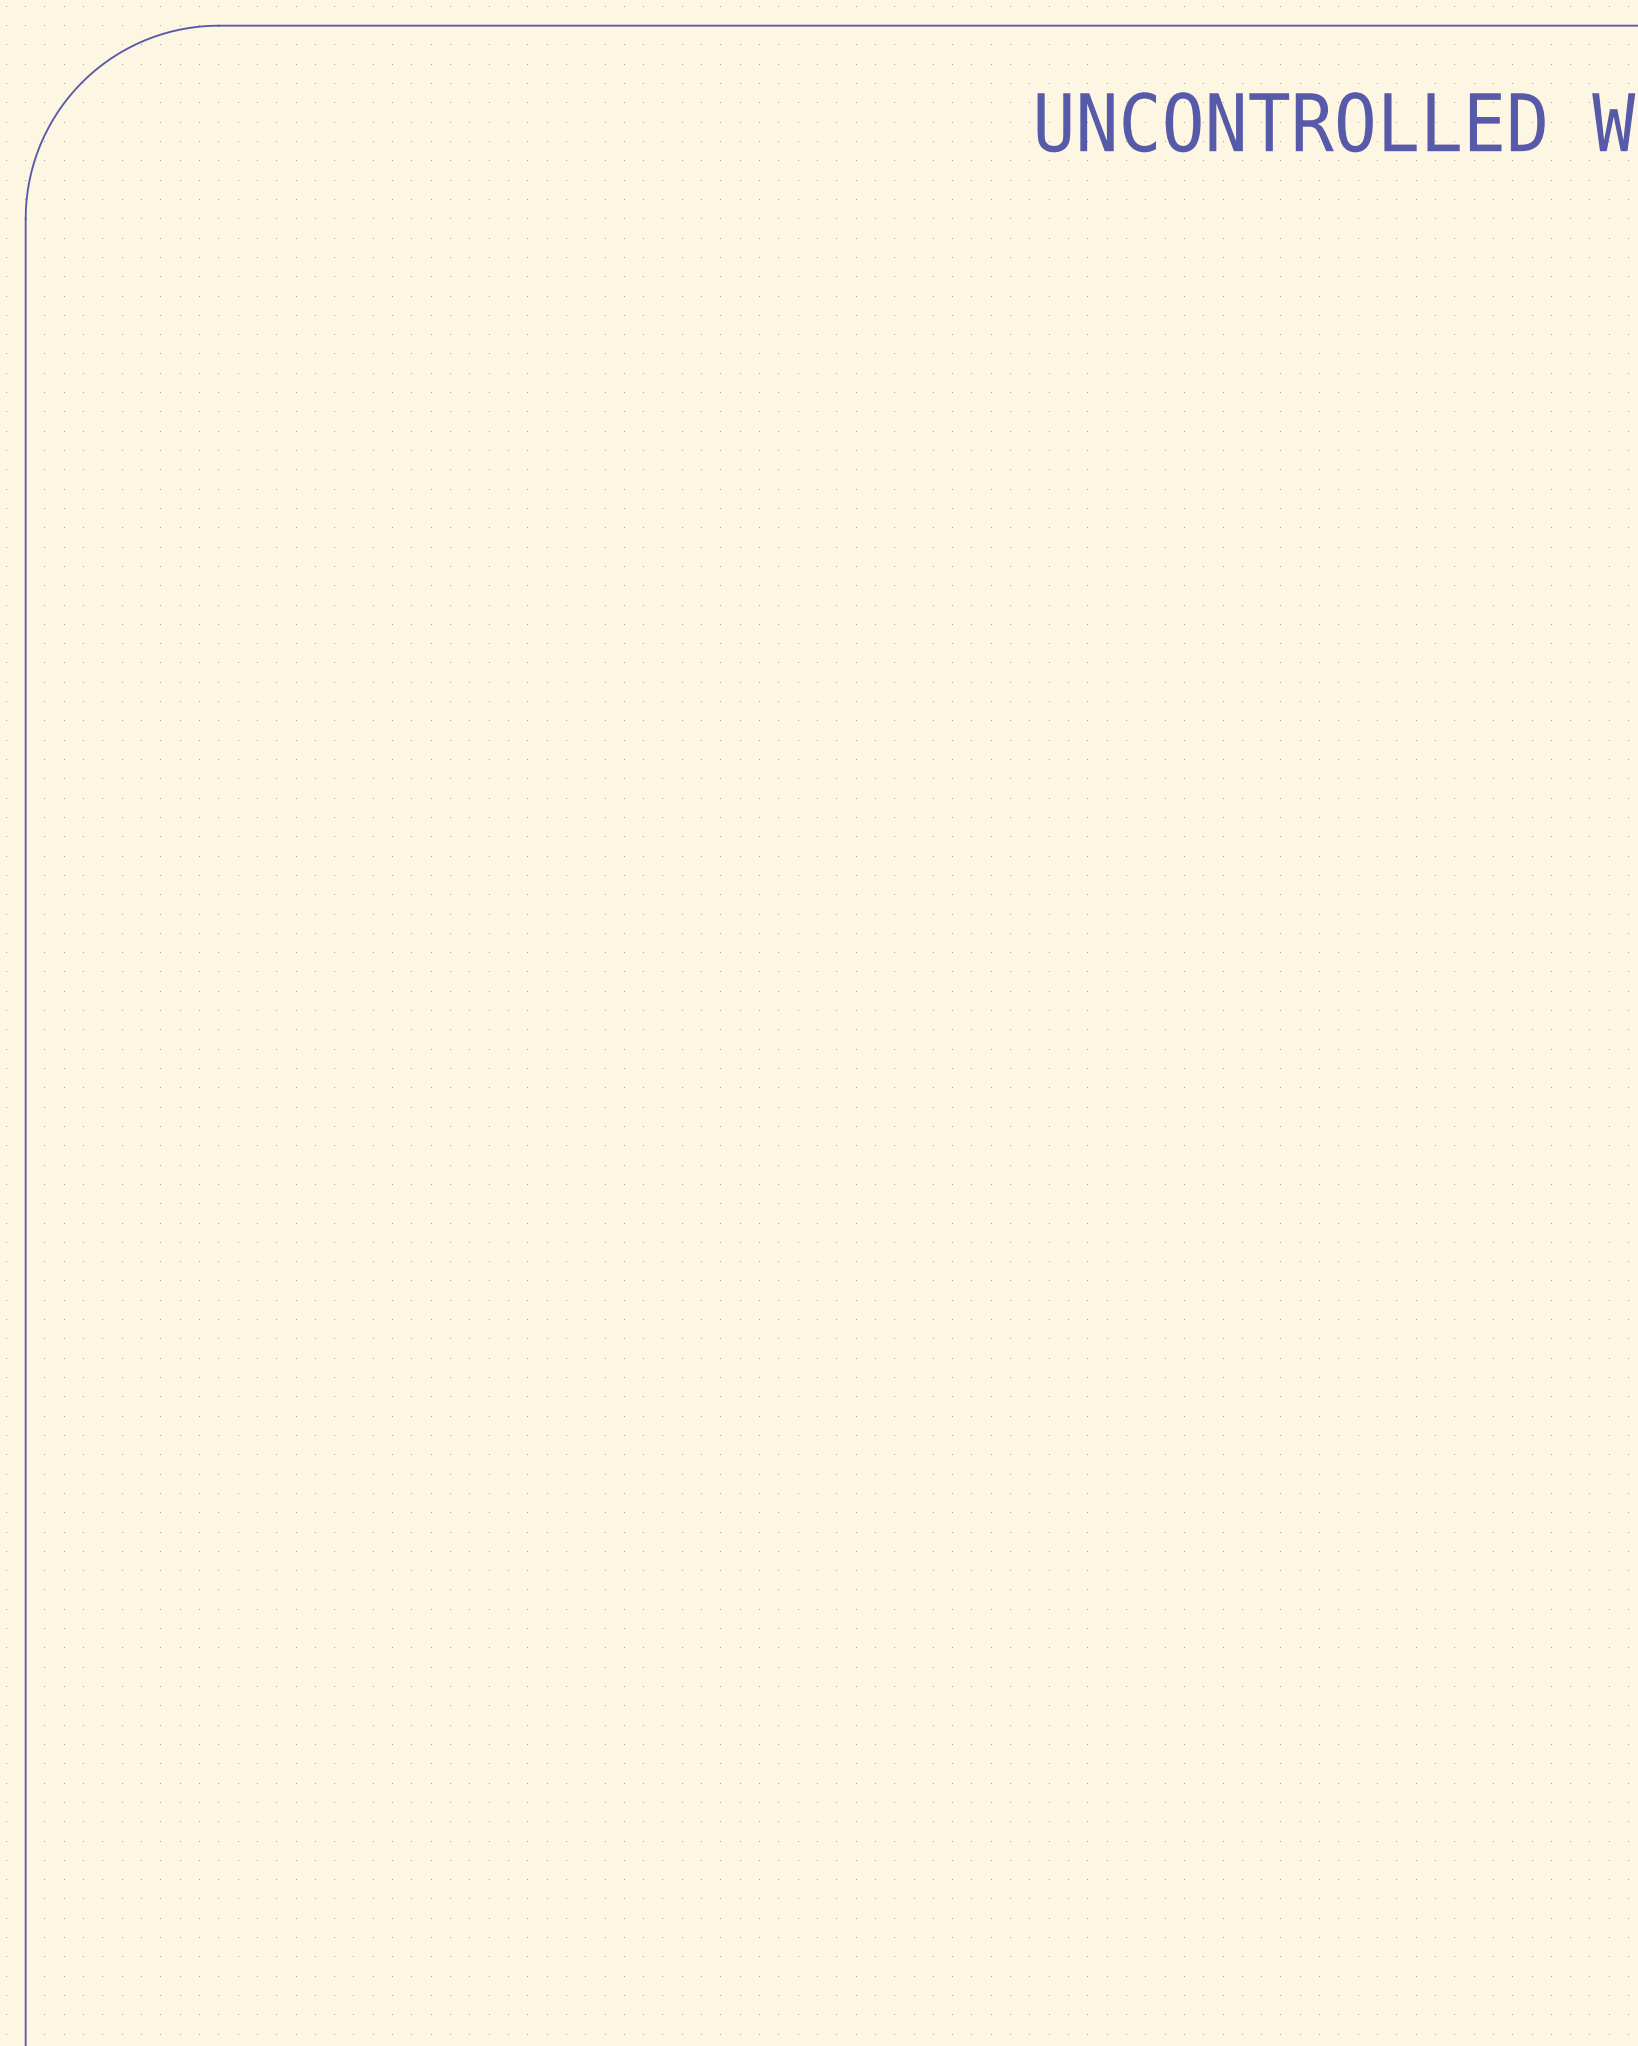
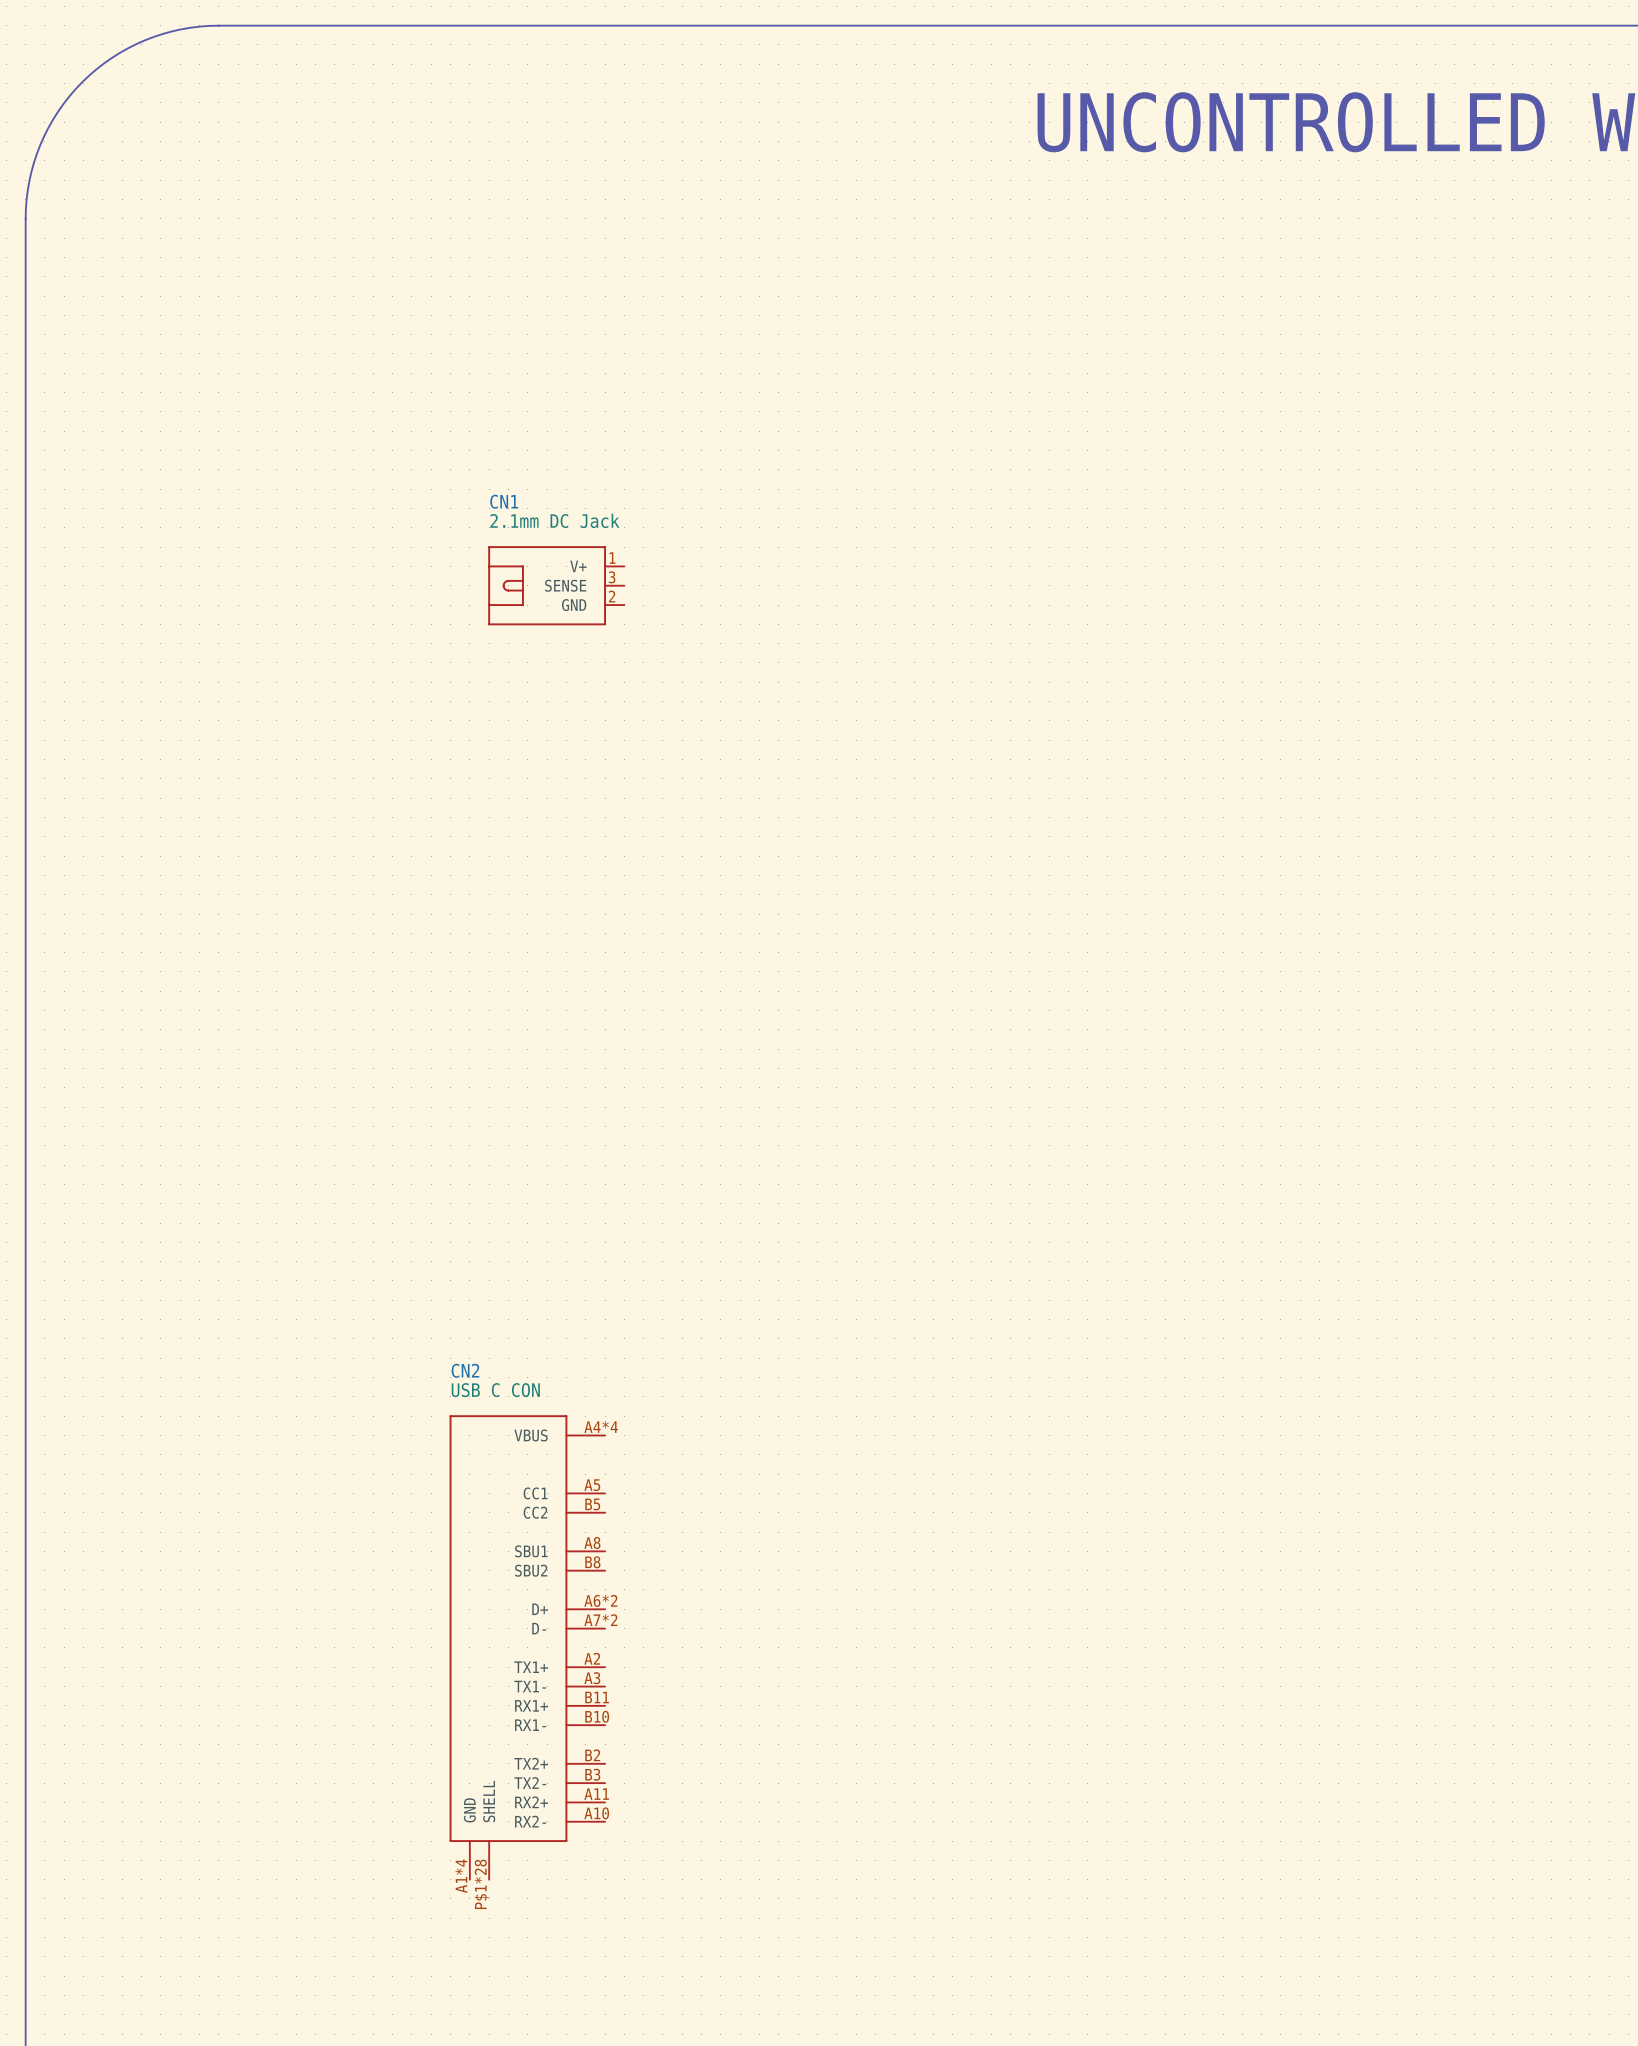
CN1: none -> 2.1mm DC Jack (556, 585)
CN2: none -> USB C CON (527, 1647)

